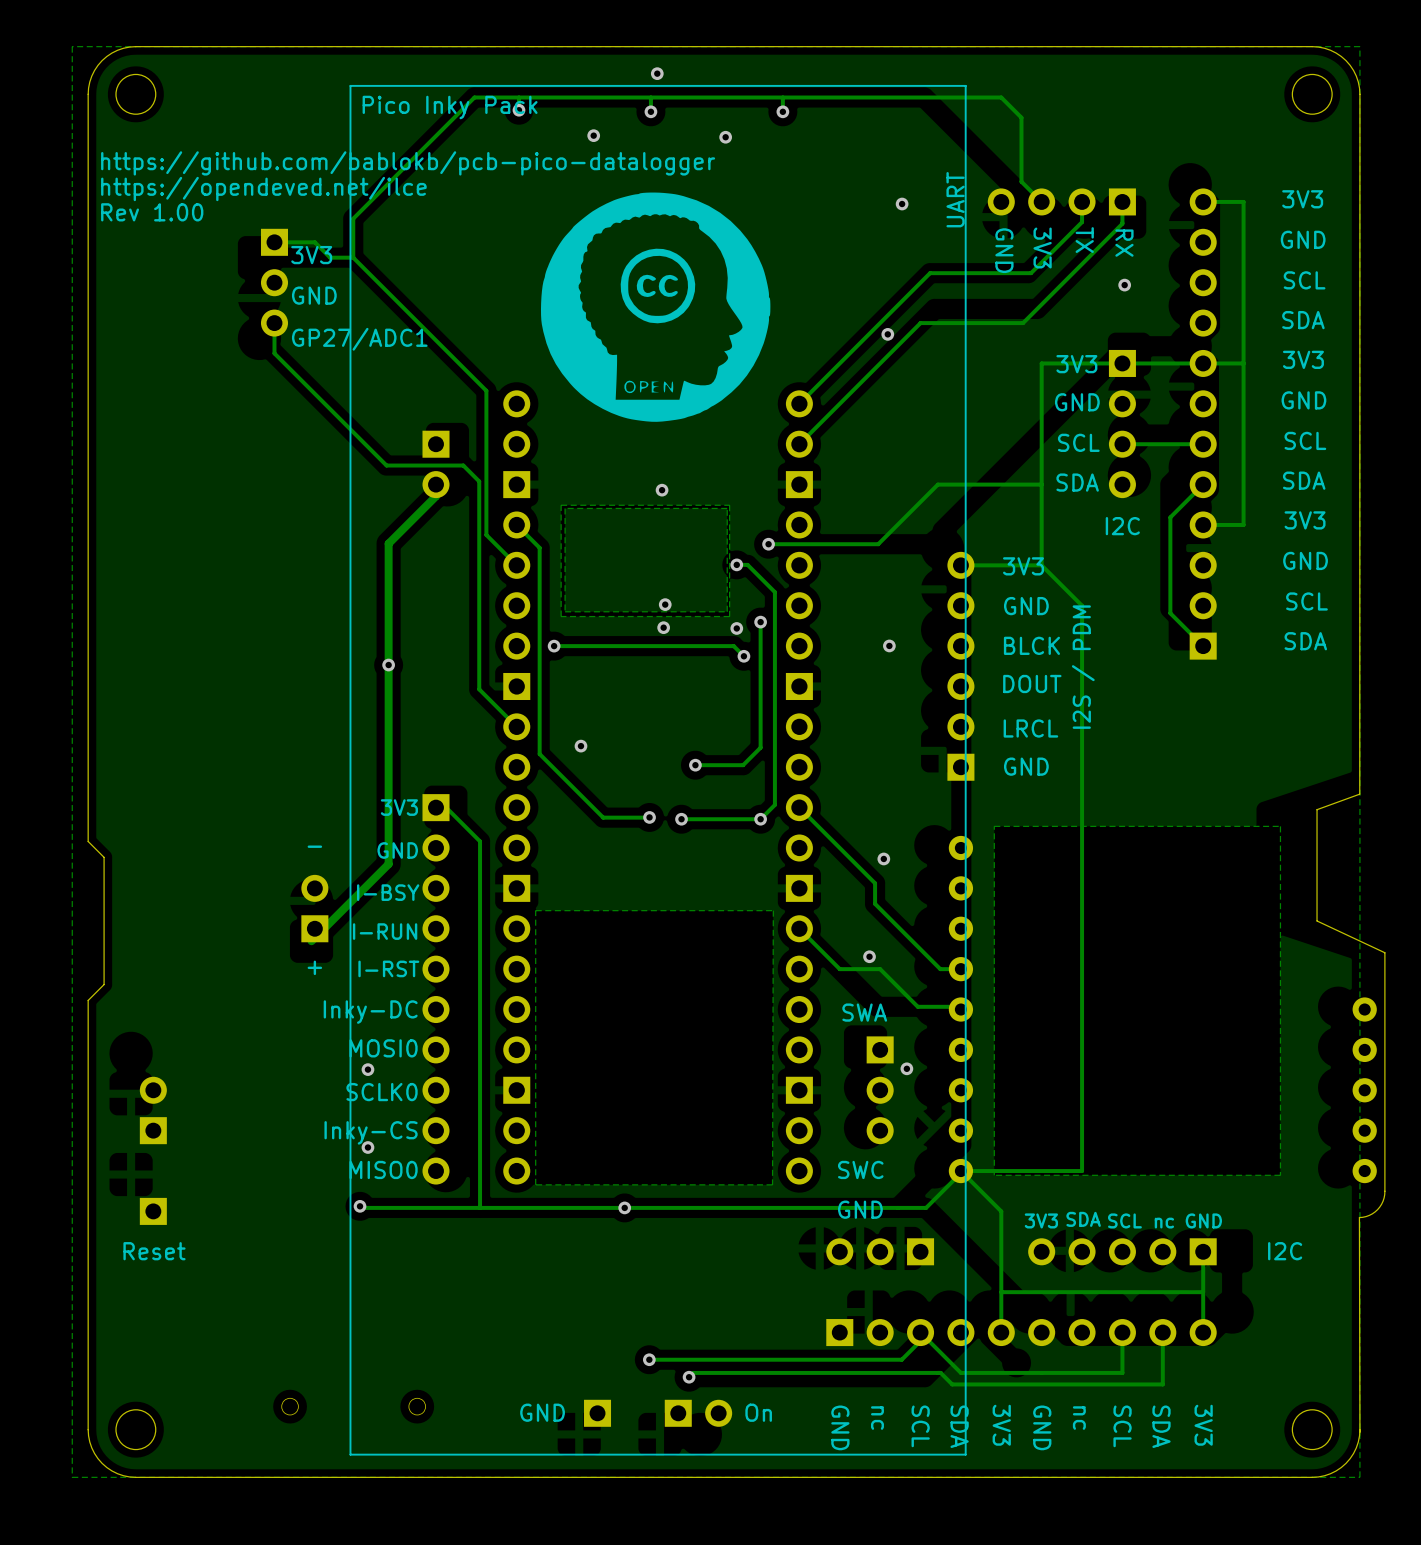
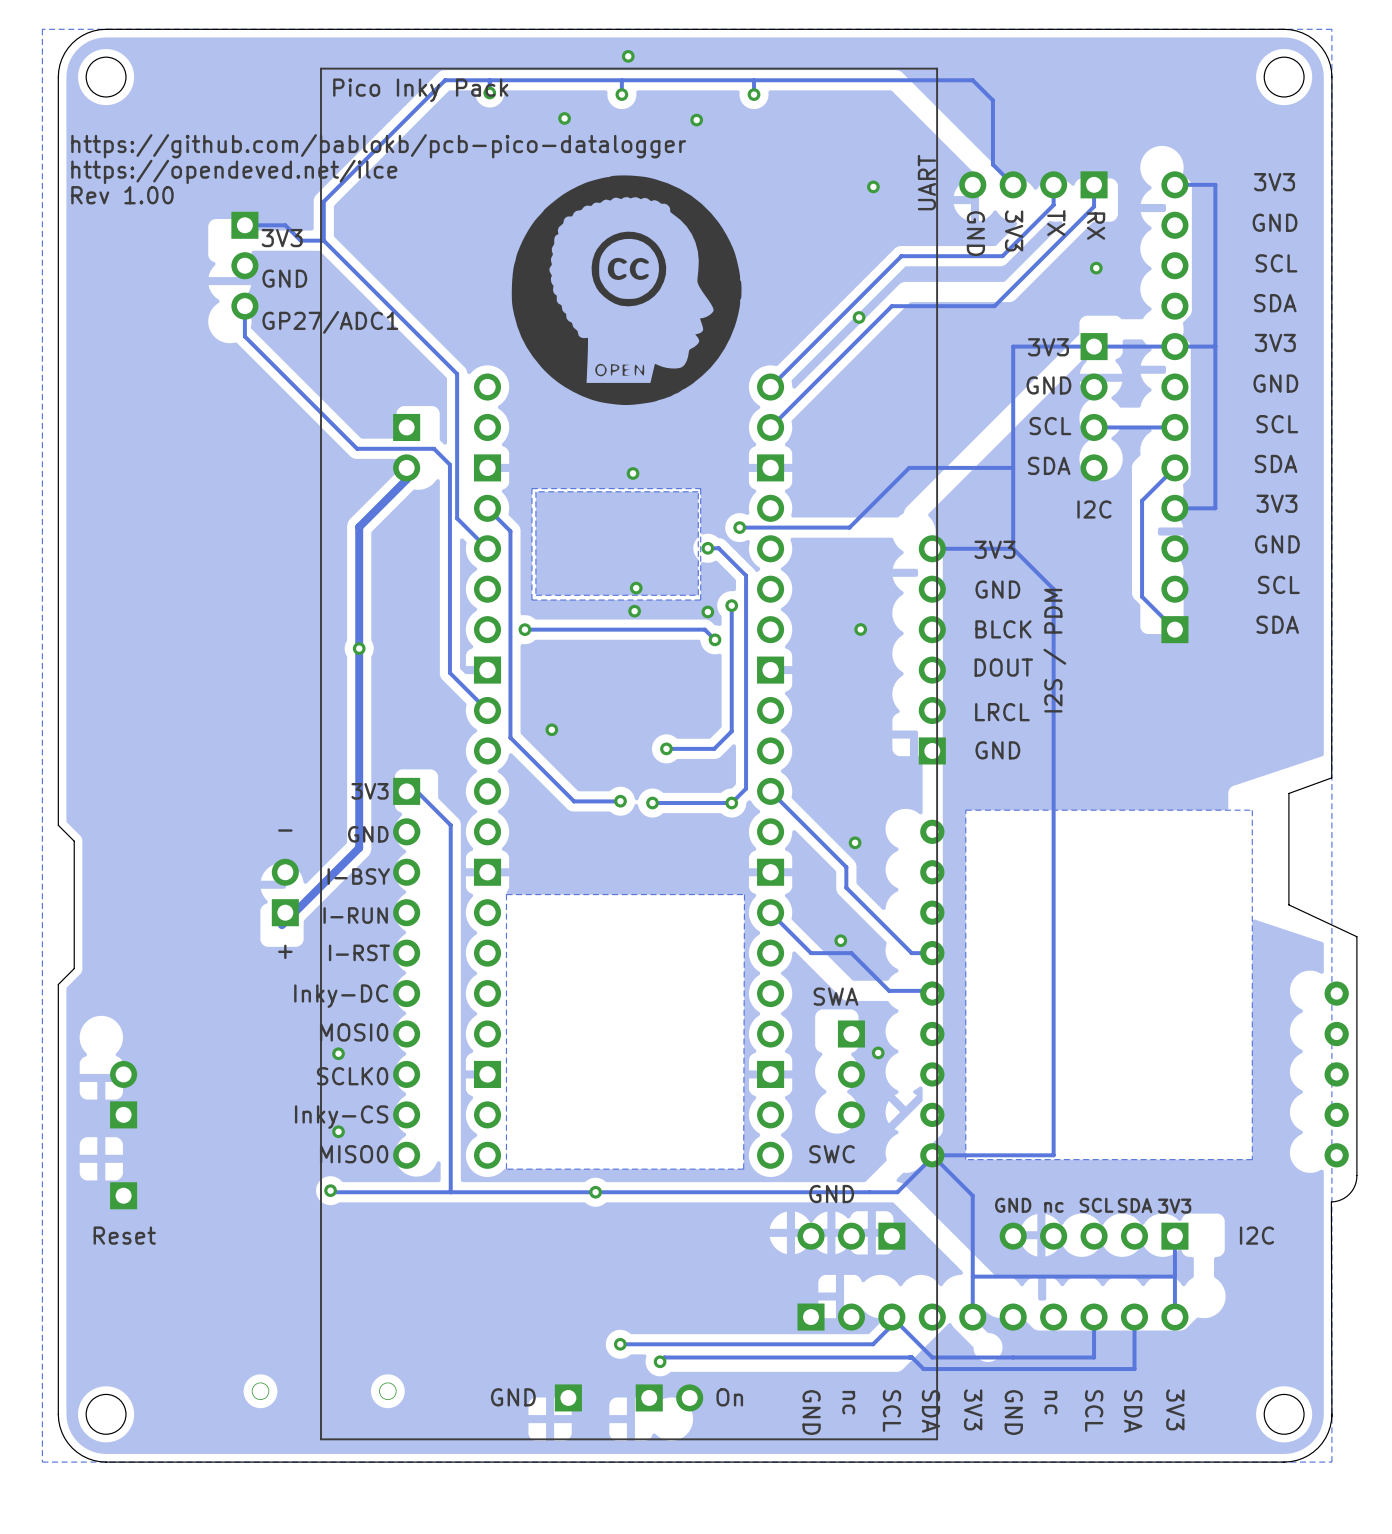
text: SDA (1083, 1219) -> nc (1053, 1207)
text: 3V3 (1041, 1220) -> GND (1013, 1205)
text: GND (1203, 1220) -> 3V3 (1174, 1206)
text: nc (1164, 1223) -> SDA (1135, 1205)

